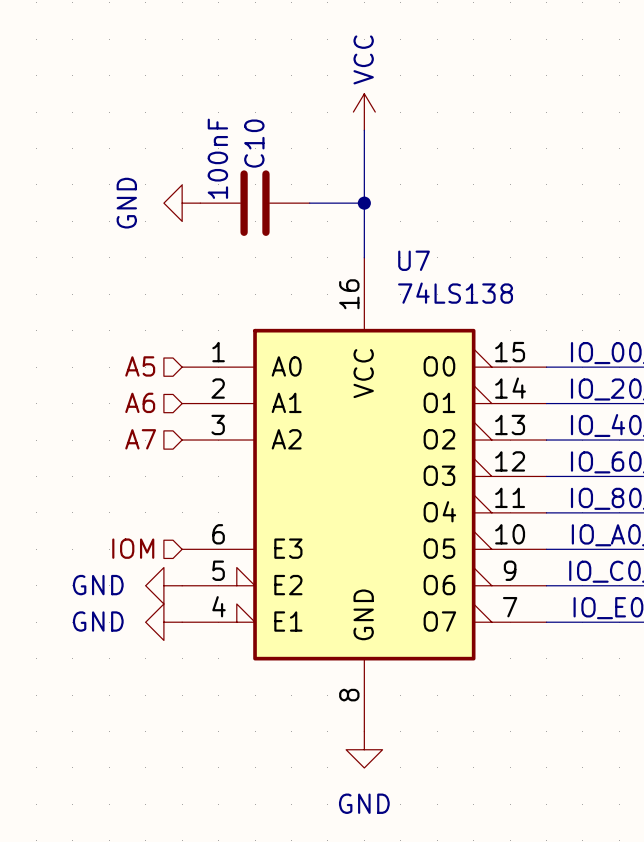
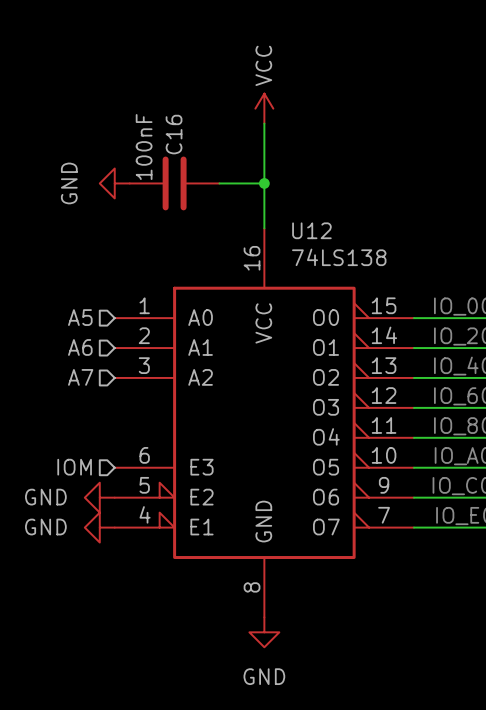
C10 name: C10 (254, 143) -> C16 (174, 134)
U7 name: U7 (414, 260) -> U12 (311, 230)

